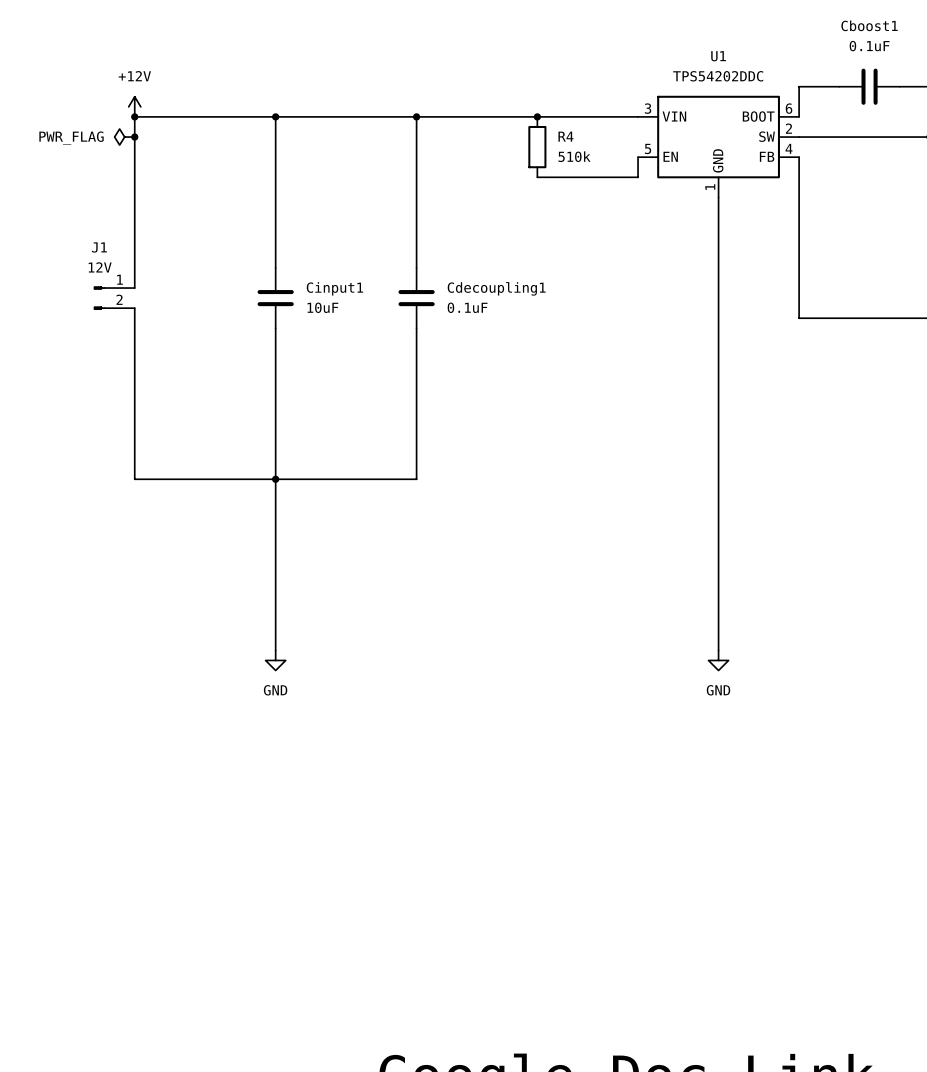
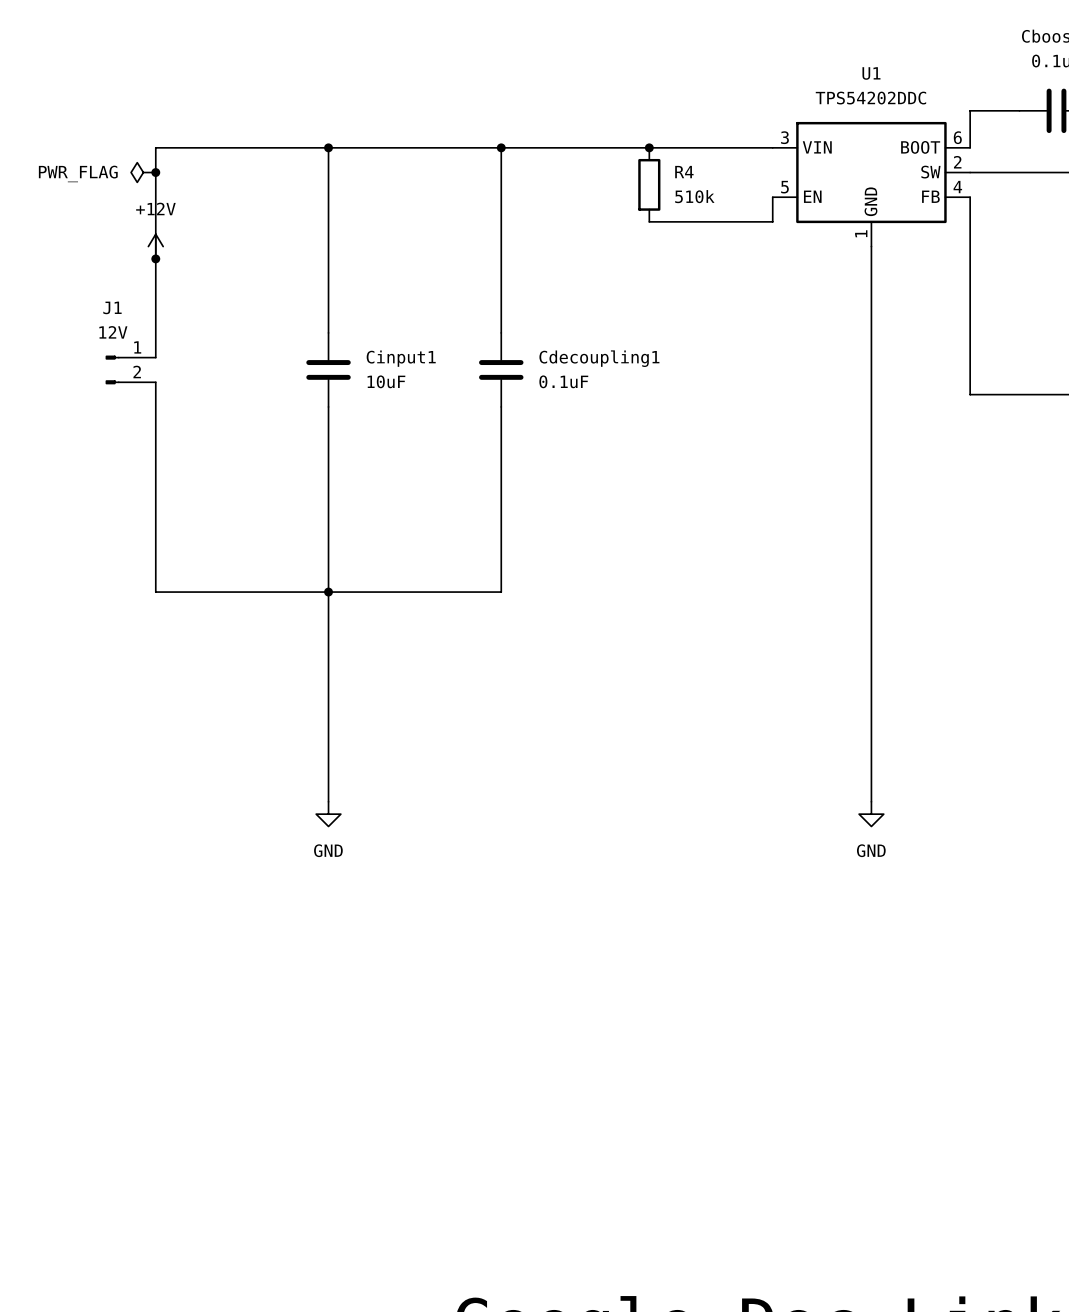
power symbol position: +12V (134, 106) -> +12V (155, 246)
junction: (134, 116) -> none
junction: none -> (155, 258)

